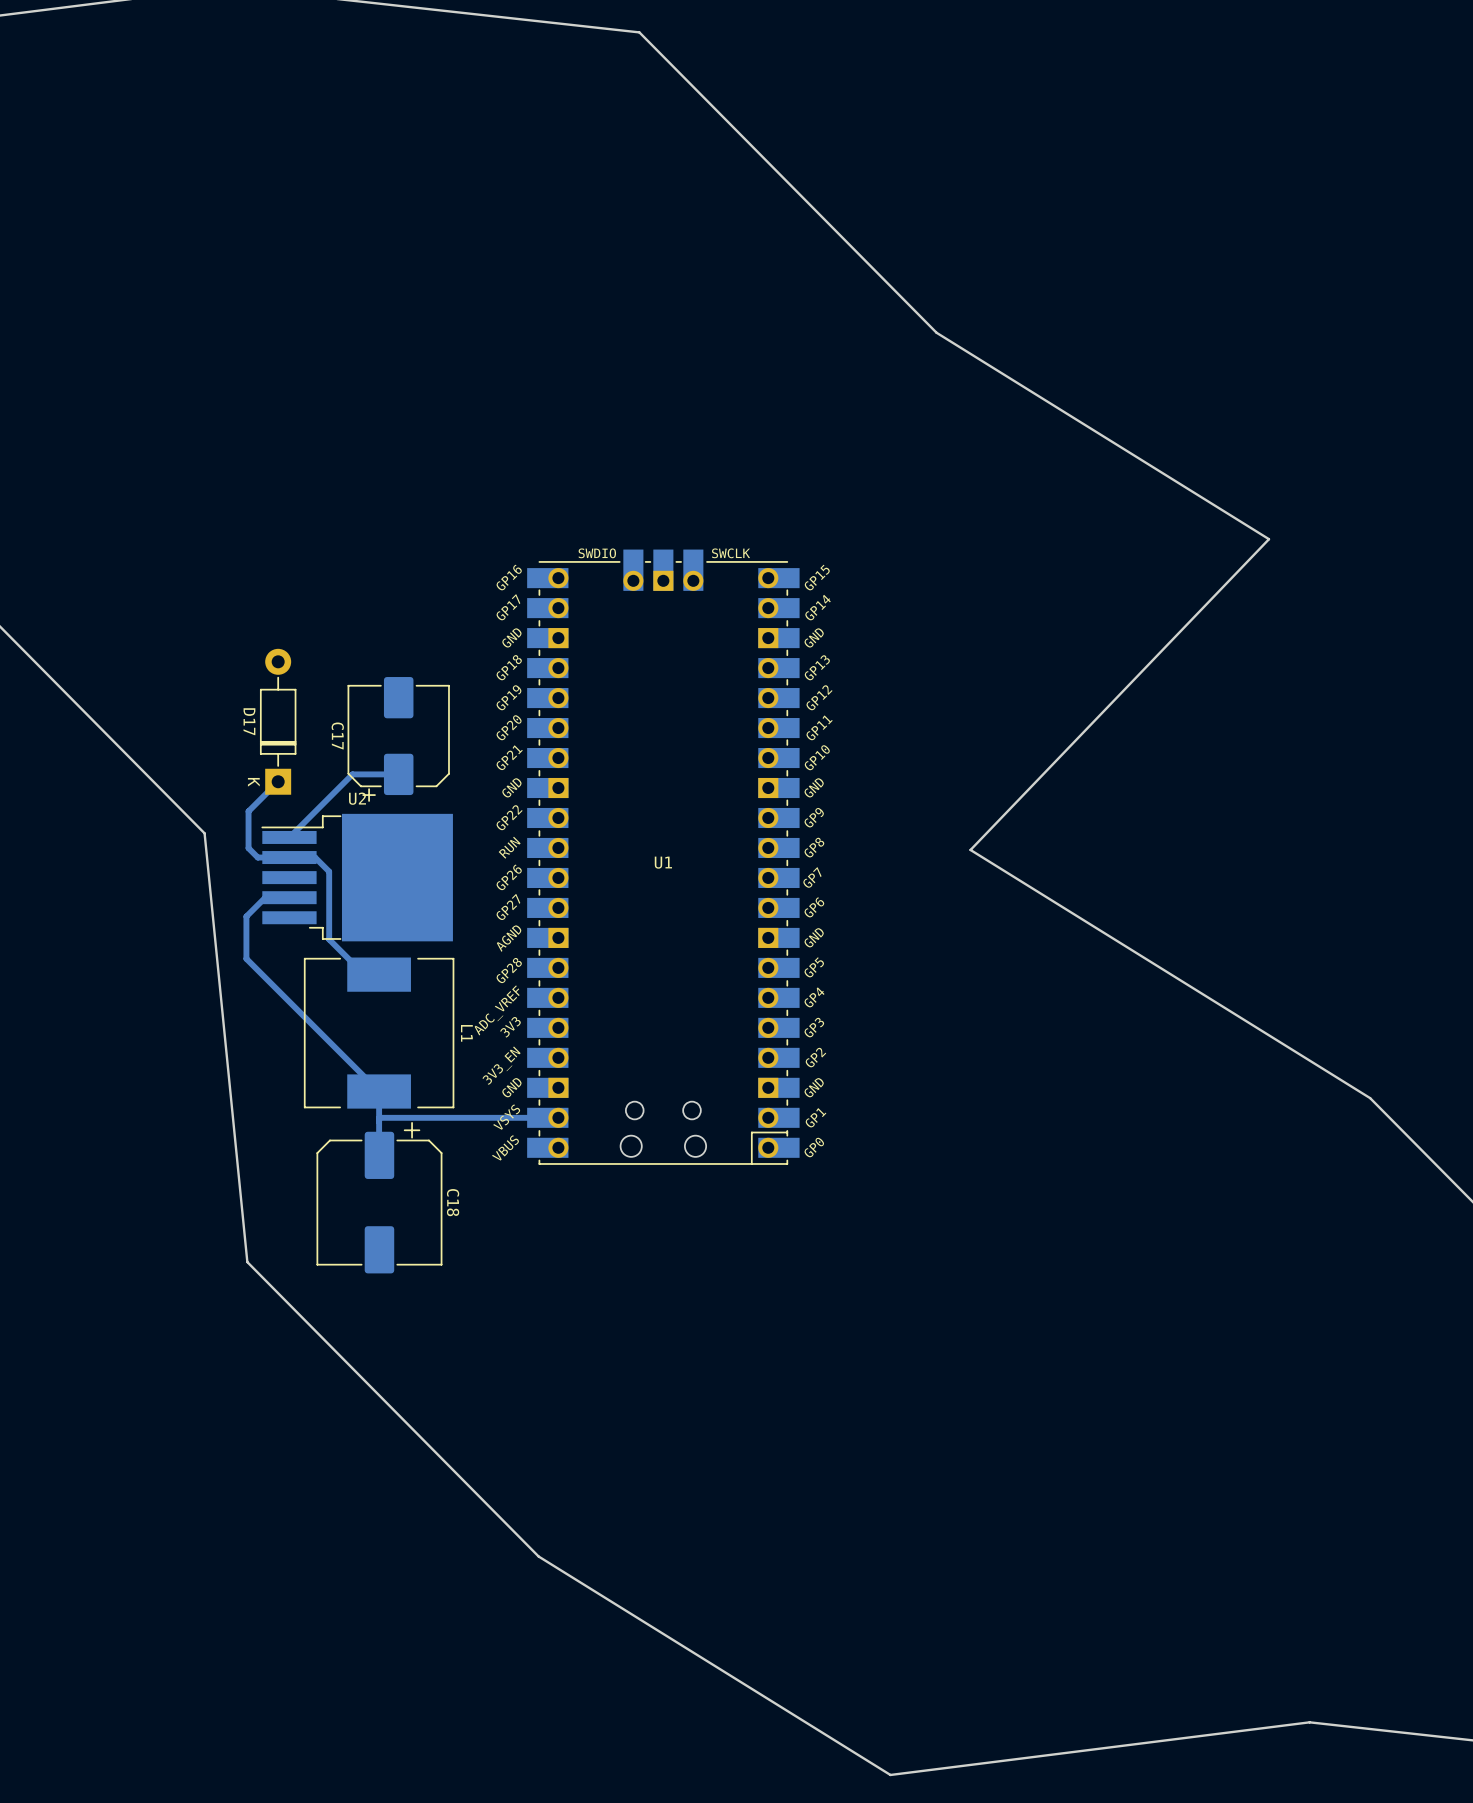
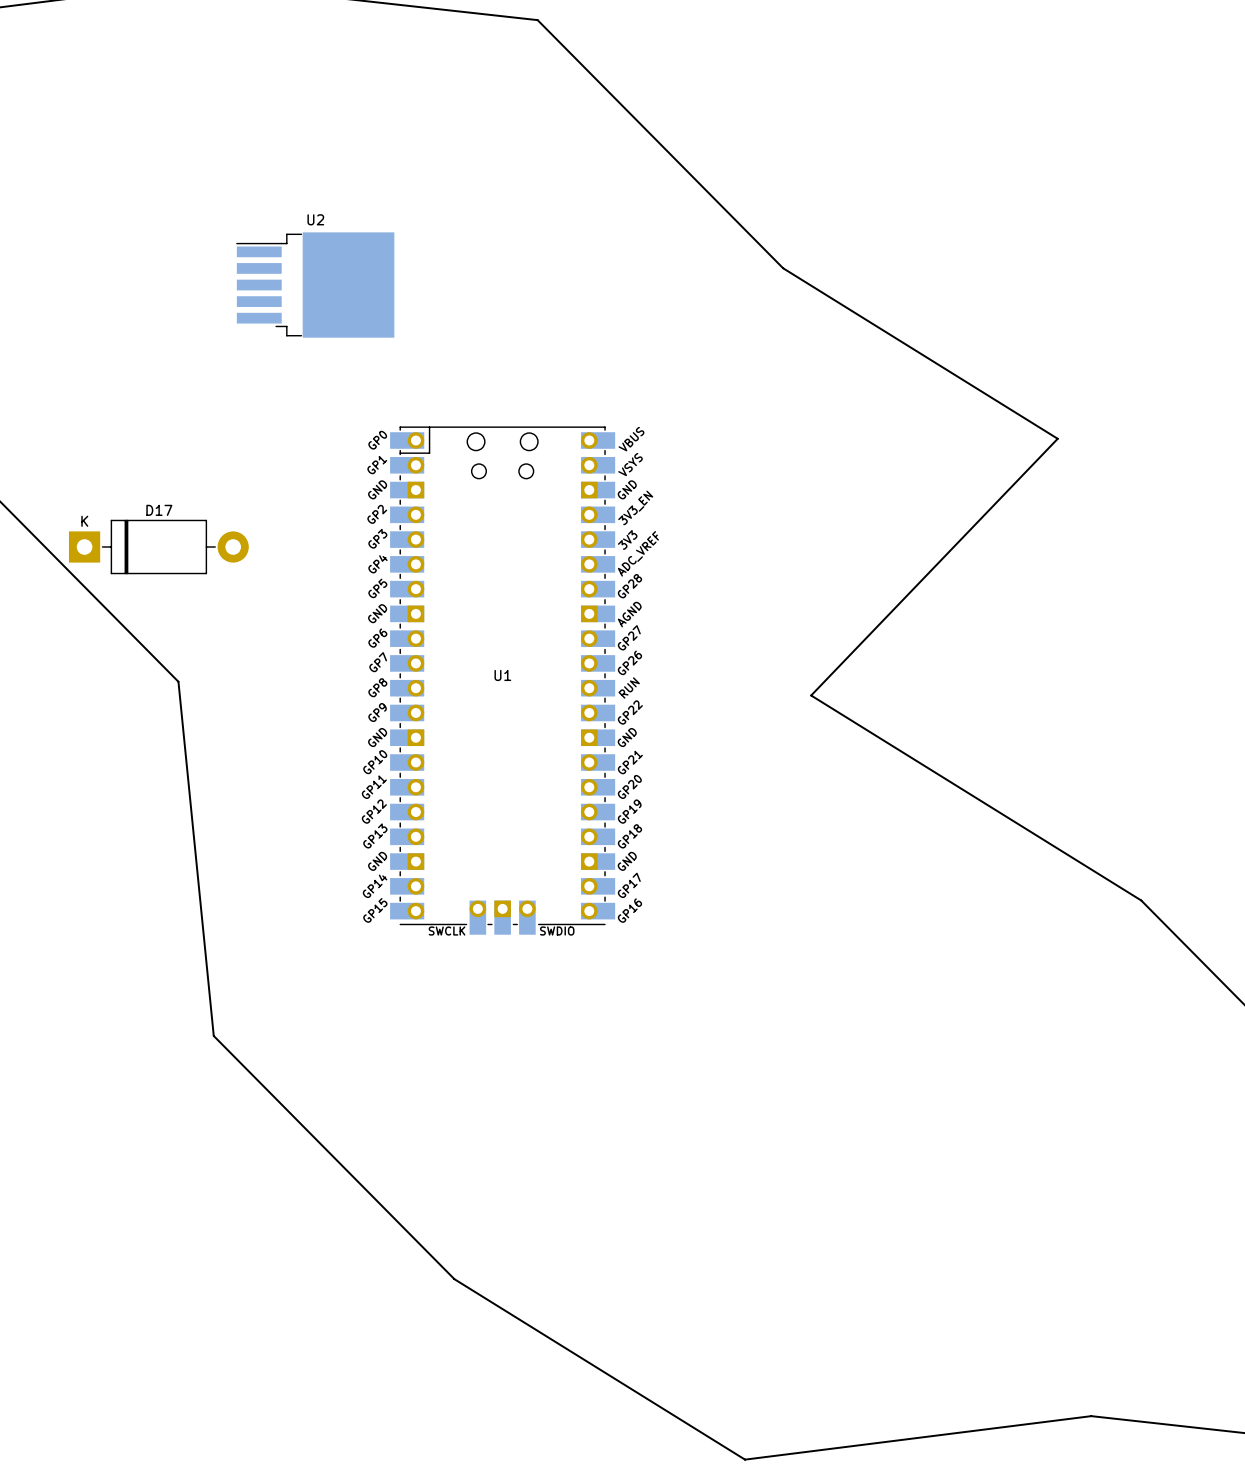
D17 footprint: [260, 648, 297, 795] -> [68, 519, 249, 575]
D17 name position: D17 (249, 721) -> D17 (159, 510)
C17: (398, 739) -> none
track: (398, 774) (352, 774) (289, 837) -> none
track: (278, 781) (248, 811) (248, 848) (257, 857) (315, 857) (329, 871) (329, 939) (364, 974) (379, 974) -> none
U1 rotation: 0° (663, 857) -> 180° (502, 680)
U2 position: (357, 877) -> (315, 285)
track: (289, 897) (265, 897) (246, 916) (246, 958) (379, 1091) (379, 1155) -> none
L1: (379, 1033) -> none
track: (558, 1117) (379, 1118) -> none
C18: (379, 1197) -> none

